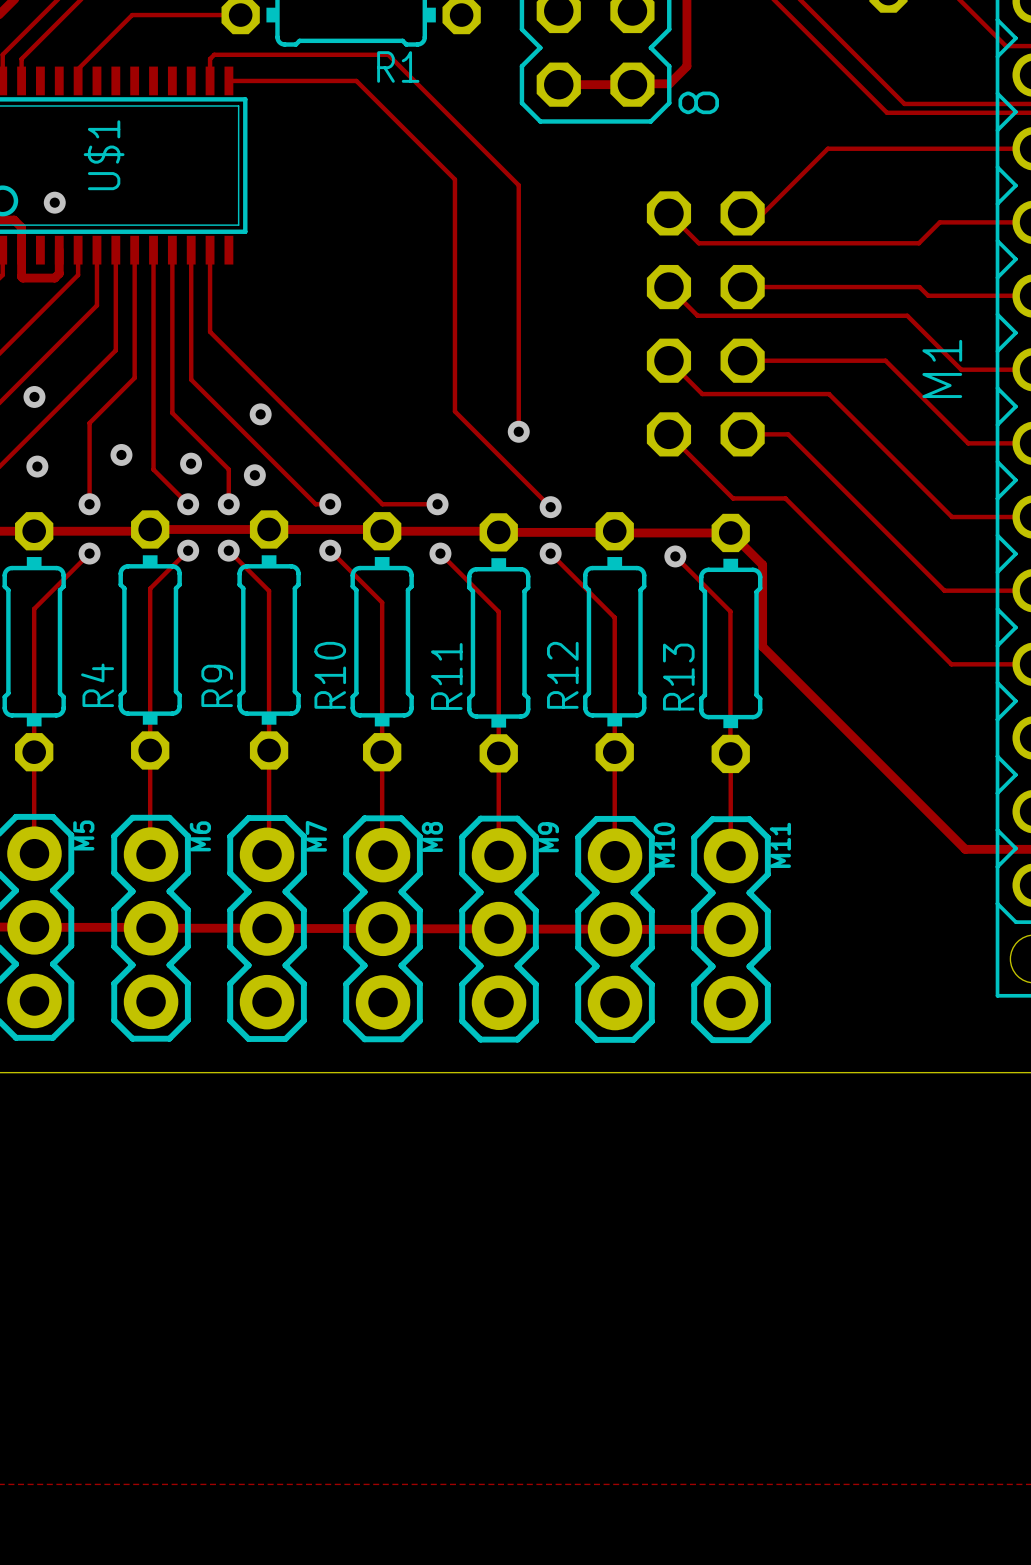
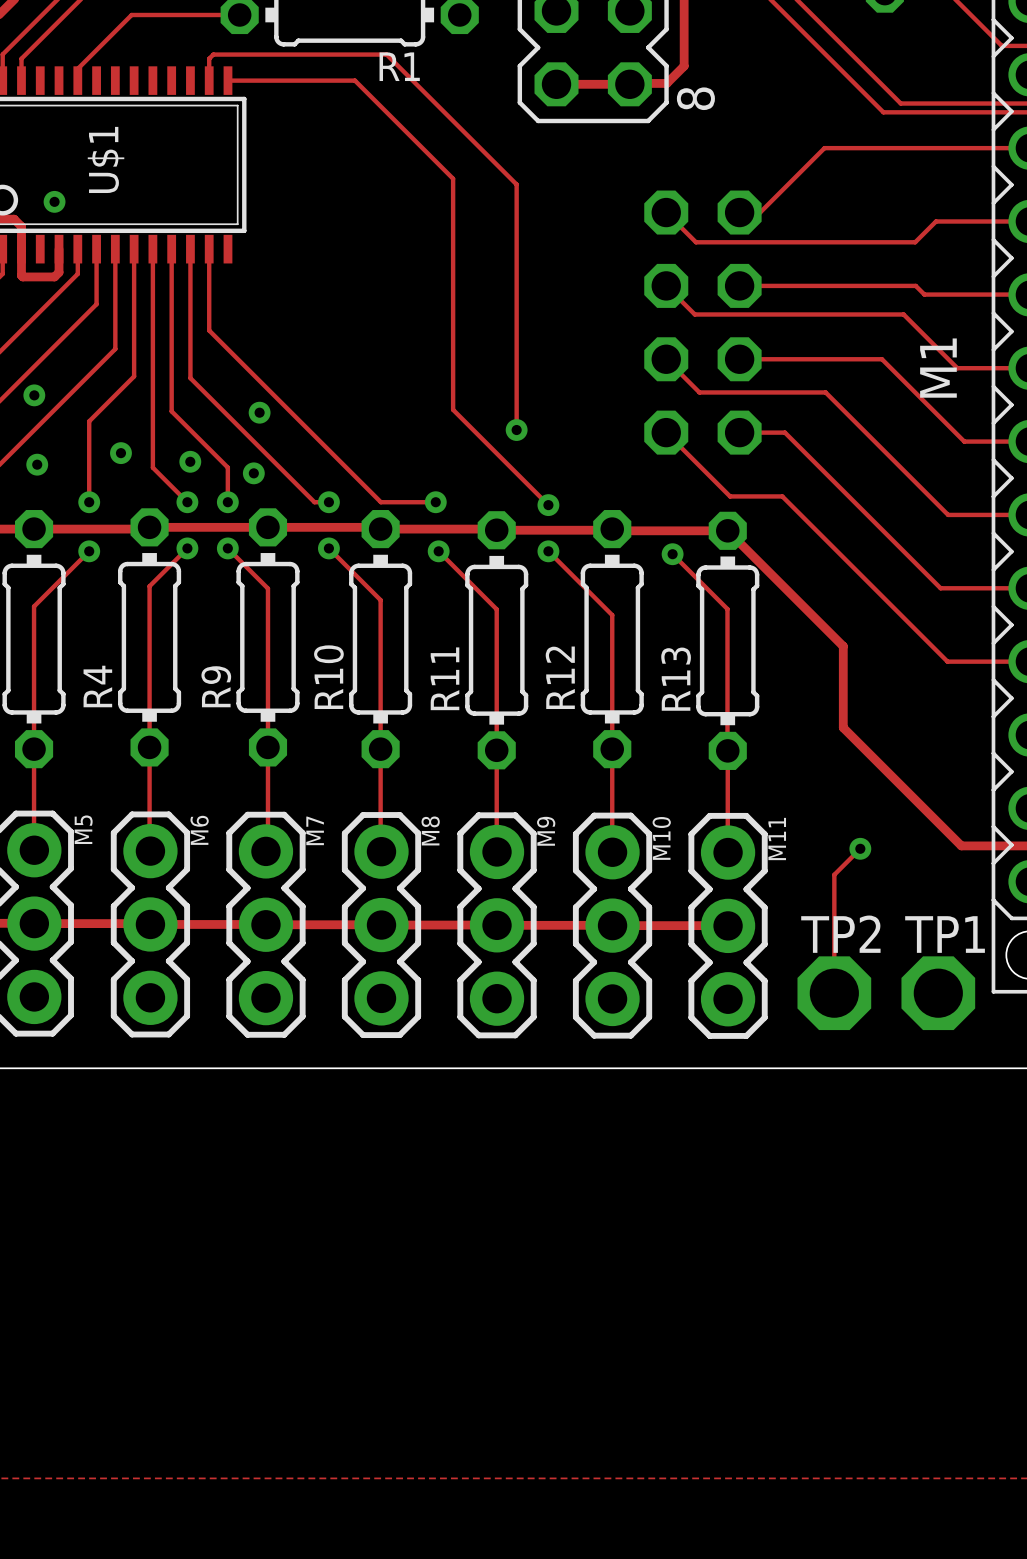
track: (762, 564) (762, 646) (846, 730) -> (759, 562) (843, 646) (843, 727)
track: none -> (860, 848) (834, 874) (834, 993)
via: none -> (860, 848)
TP2: none -> (834, 993)
TP1: none -> (938, 993)

